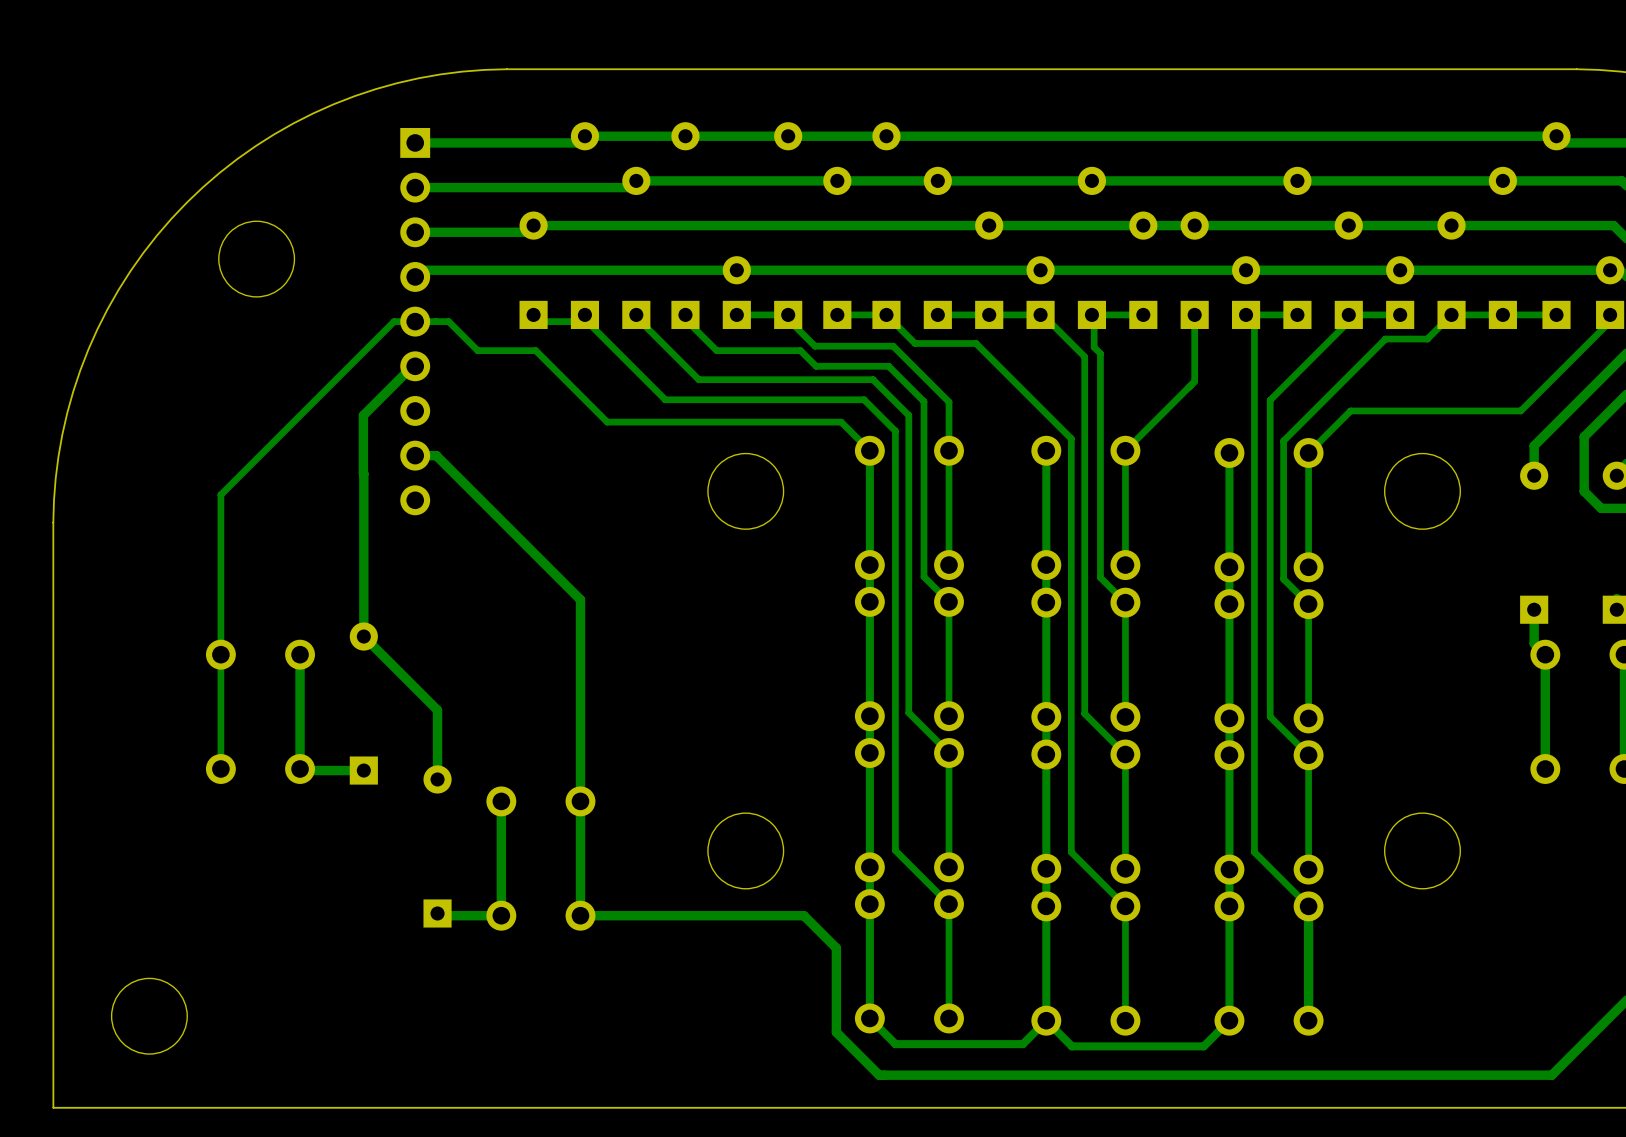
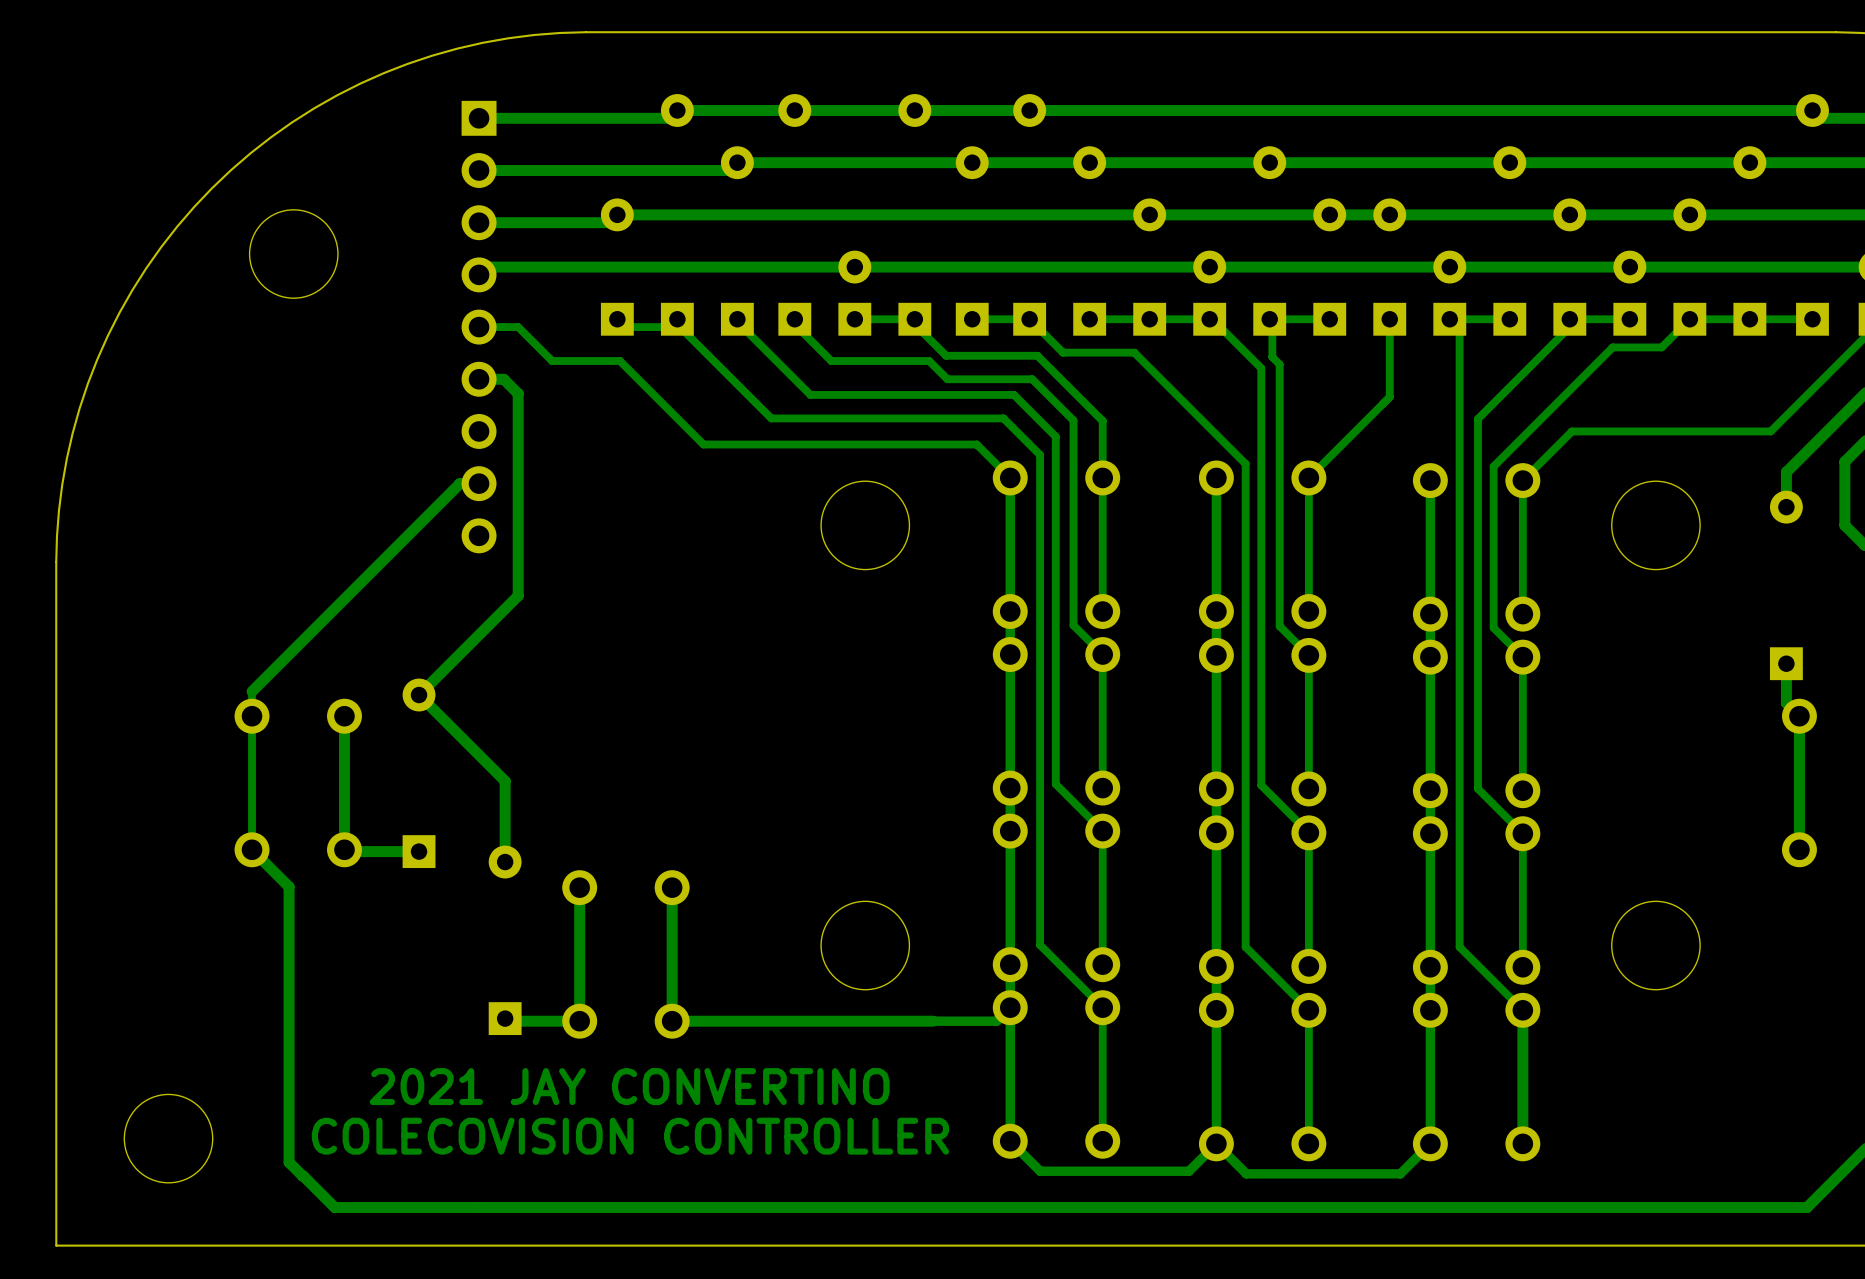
bottom track: (415, 321) (394, 321) (220, 494) (220, 633) -> (471, 483) (459, 483) (252, 691)
bottom track: (415, 366) (412, 366) (363, 415) (363, 636) -> (479, 379) (503, 379) (518, 393) (518, 595) (419, 695)
bottom track: (415, 455) (436, 455) (580, 599) (580, 801) -> none
bottom track: none -> (252, 849) (289, 886) (289, 1162) (334, 1207) (1021, 1207)
bottom track: (804, 915) (836, 948) (836, 1032) (879, 1075) -> (933, 1021) (996, 1021) (1010, 1007)
text: none -> 2021 JAY CONVERTINO (629, 1086)
text: none -> COLECOVISION CONTROLLER (630, 1136)

